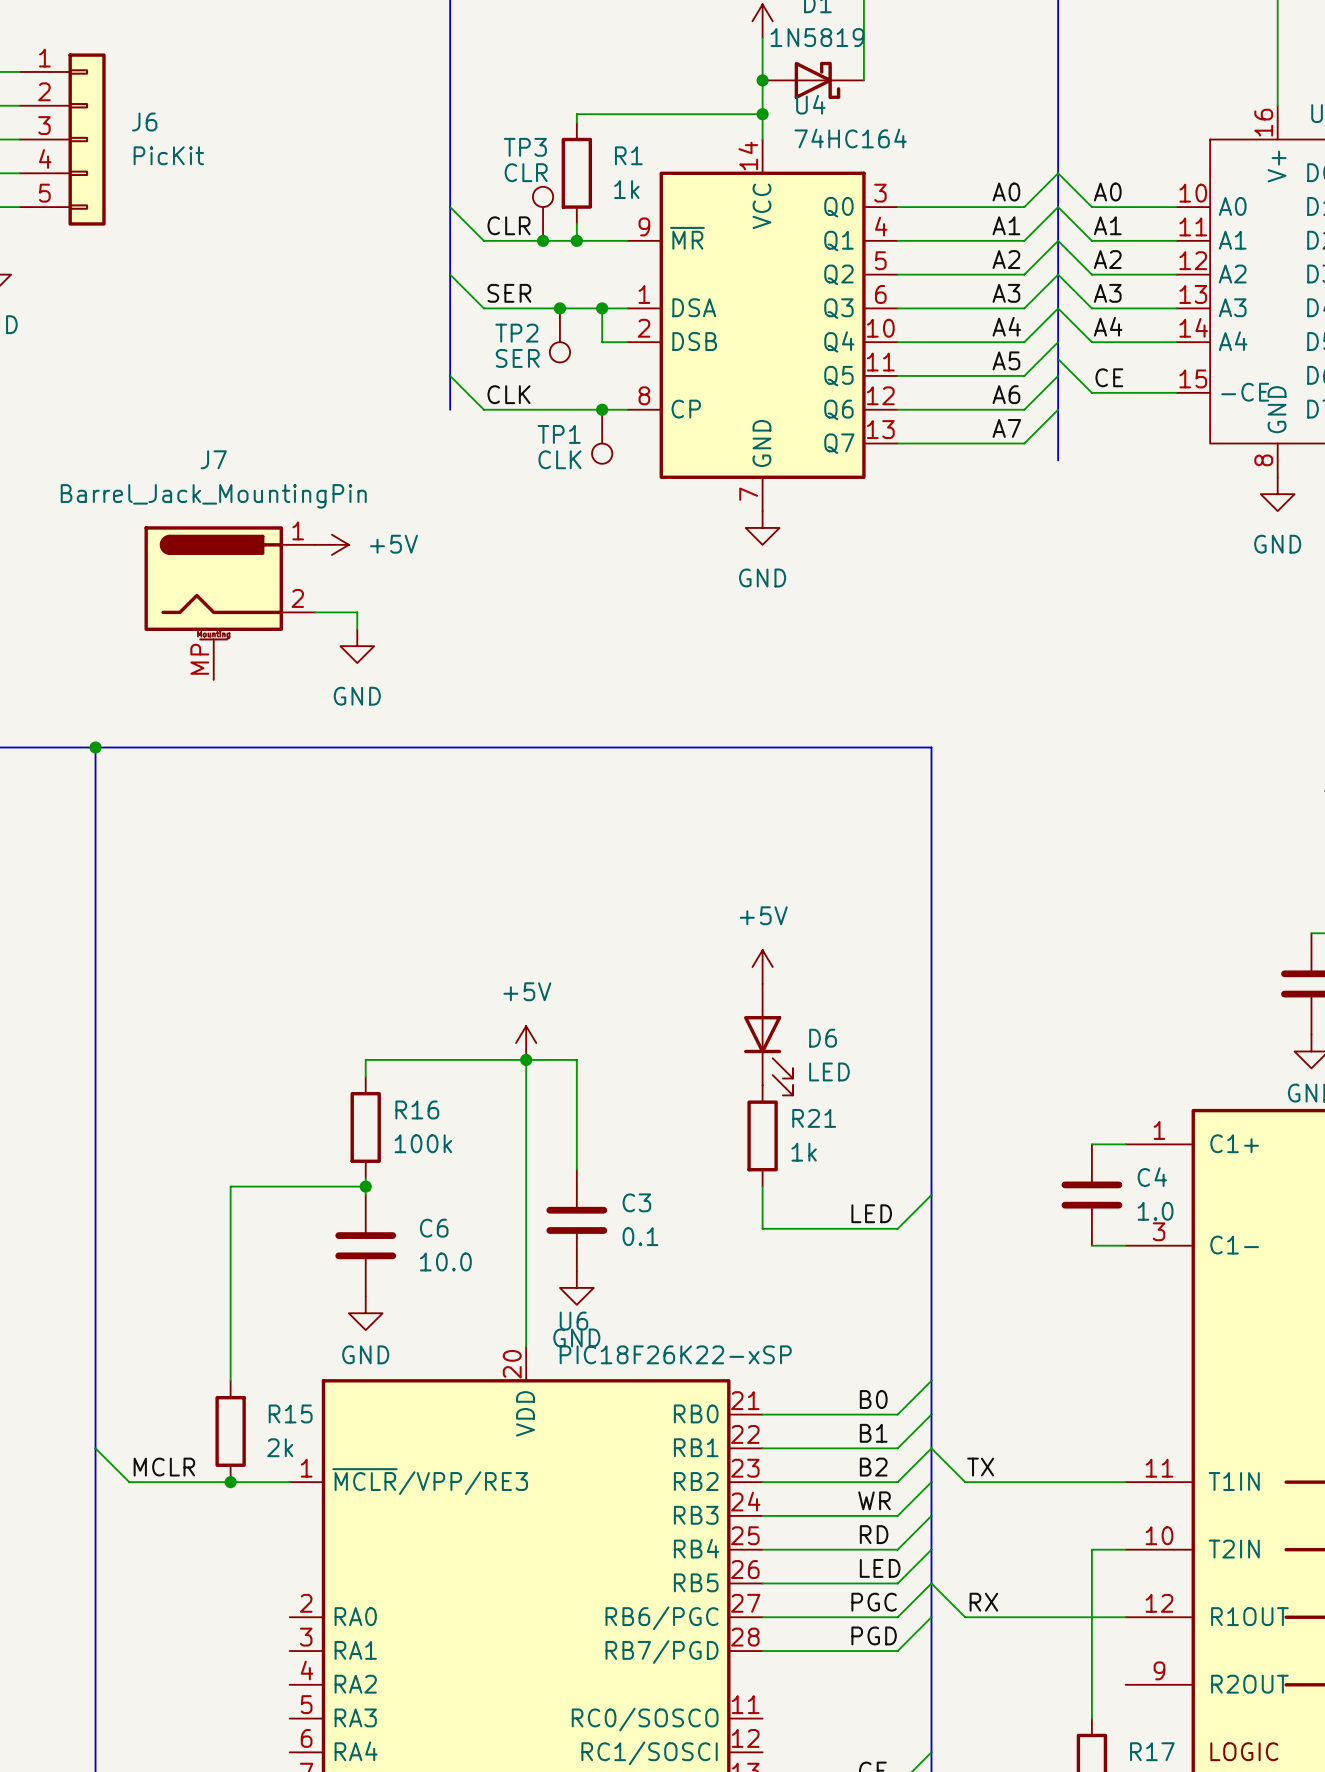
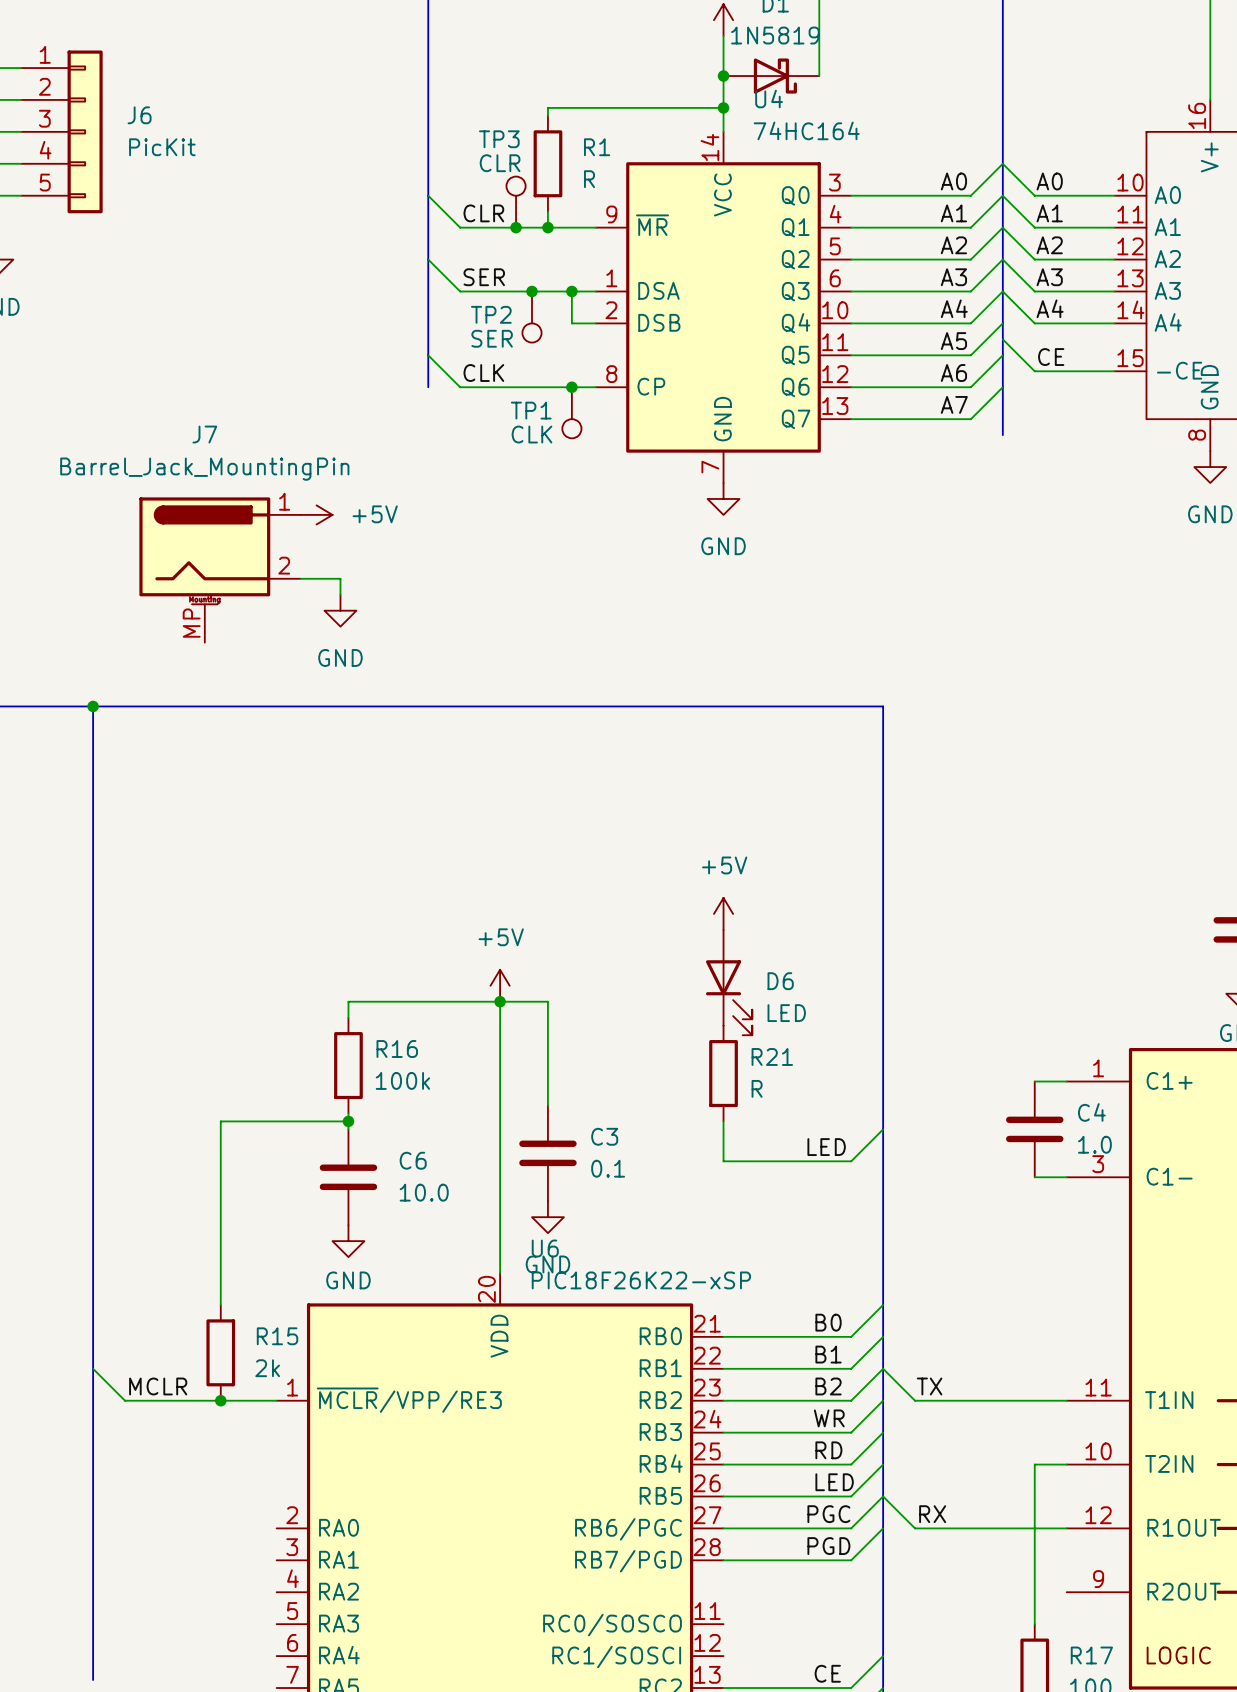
R1 value: 1k (626, 189) -> R (589, 179)
R21 value: 1k (804, 1152) -> R (757, 1088)

